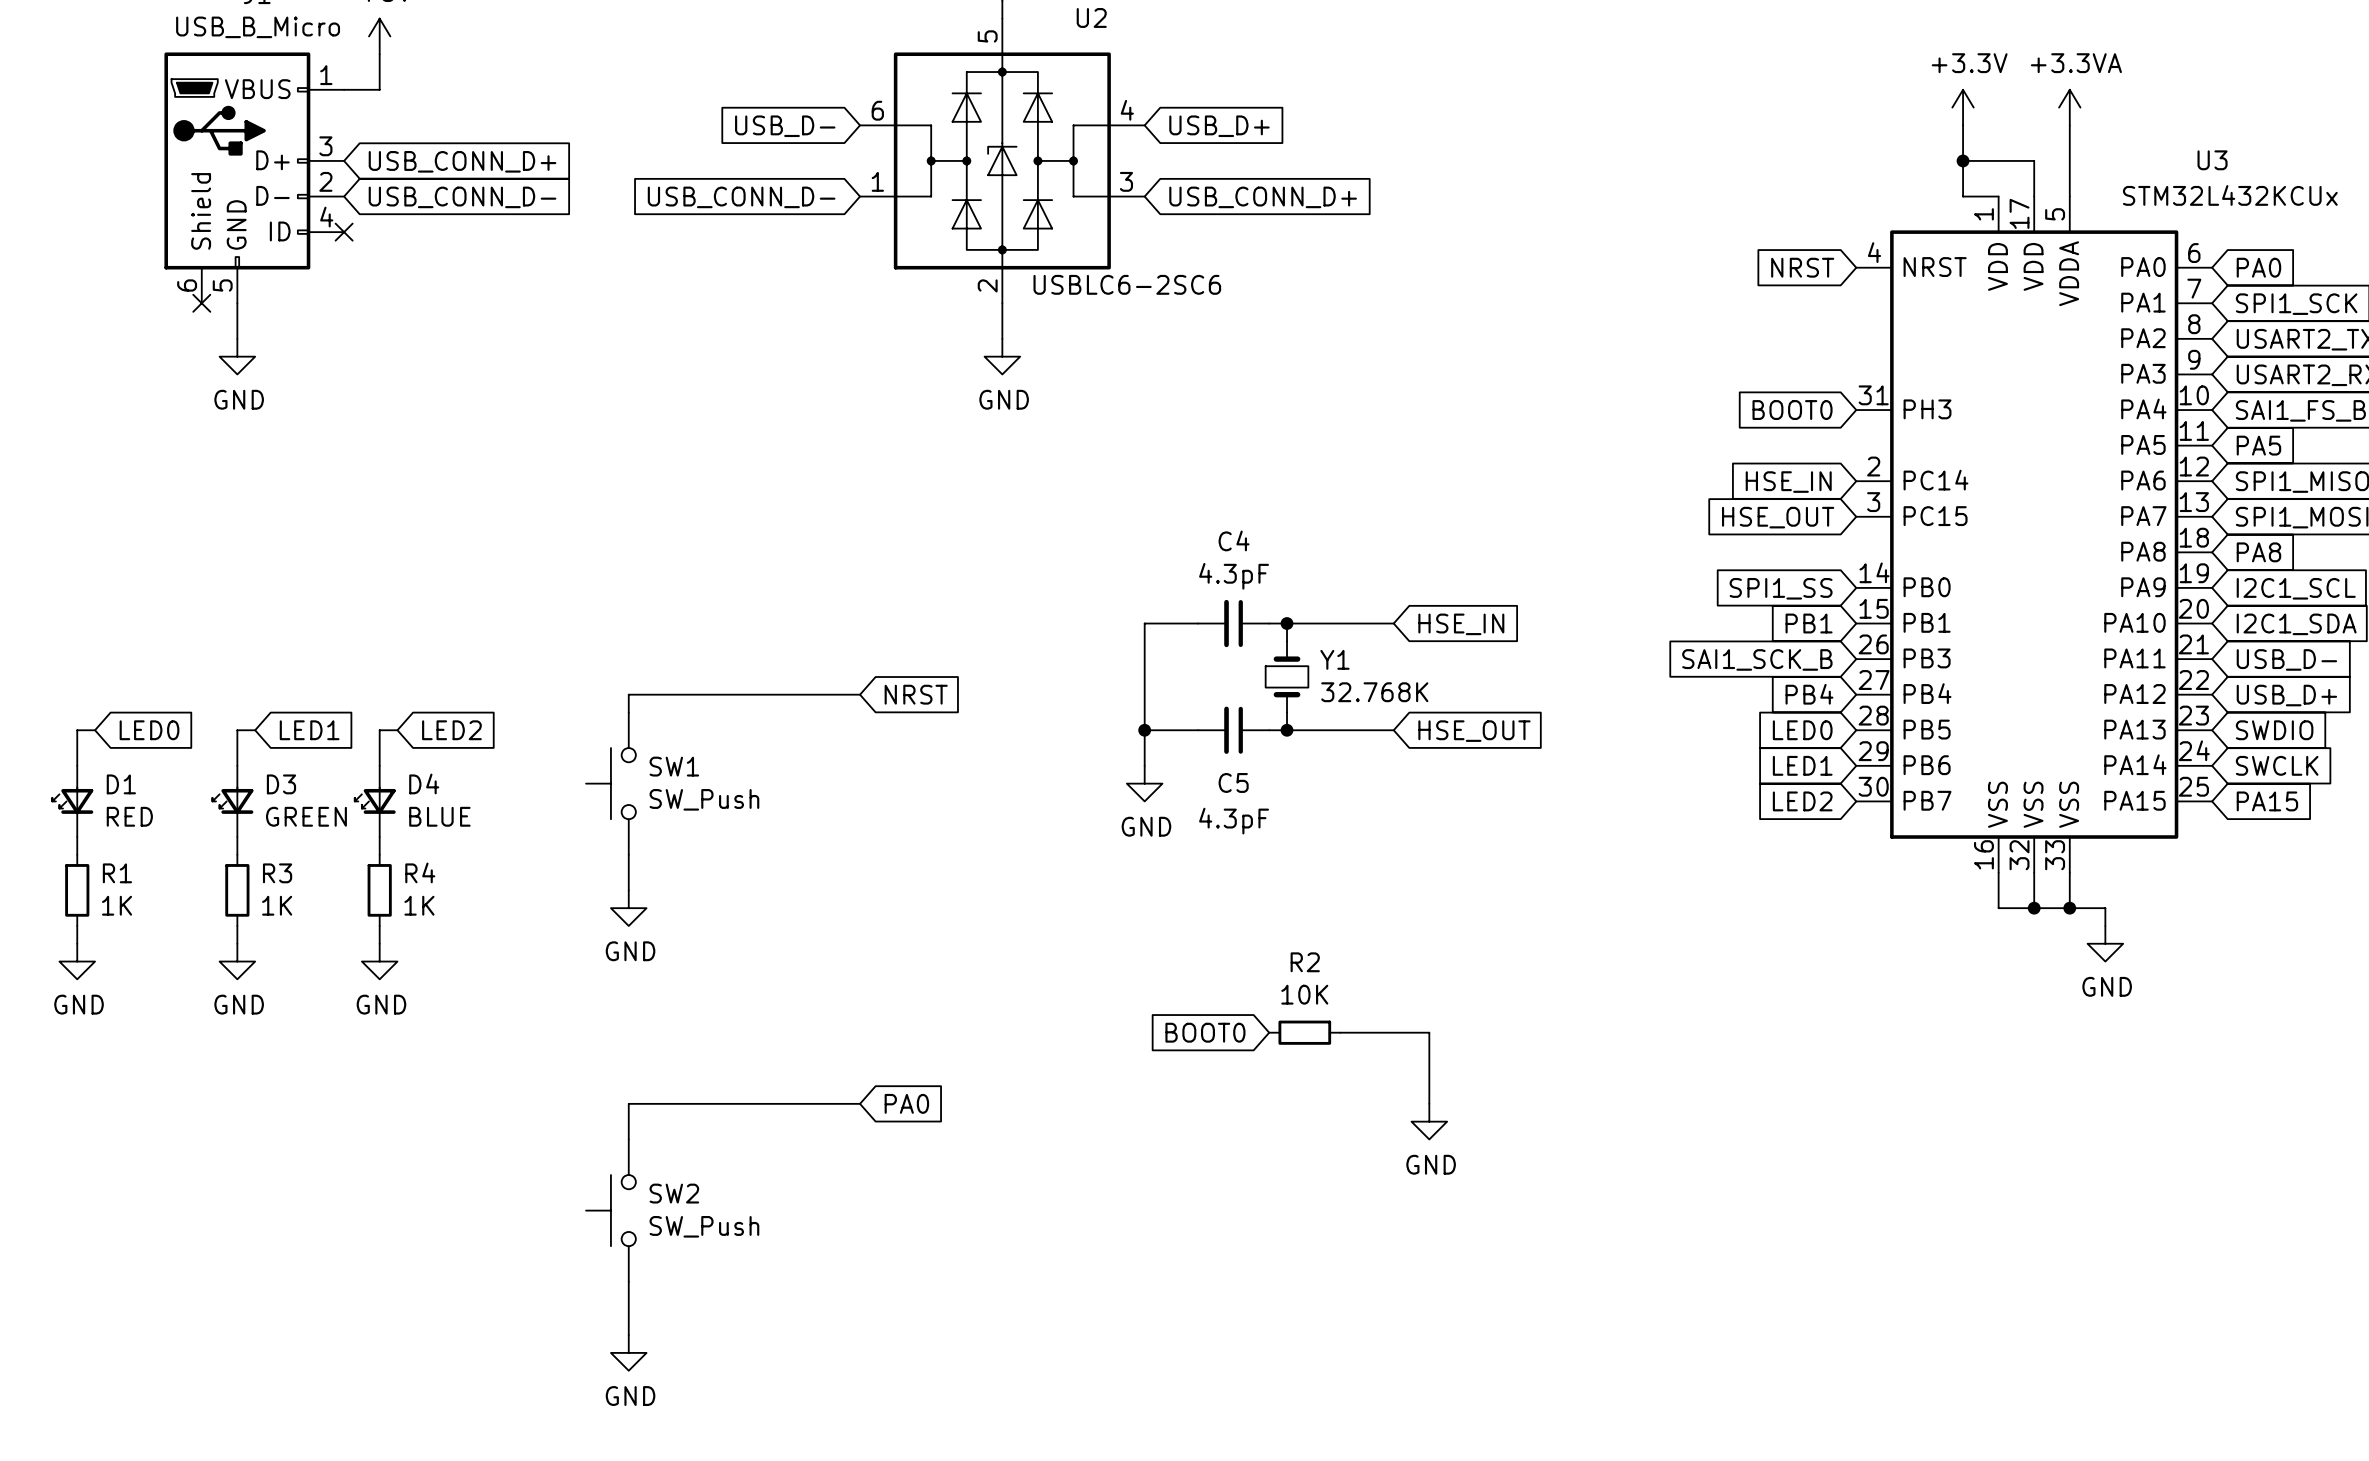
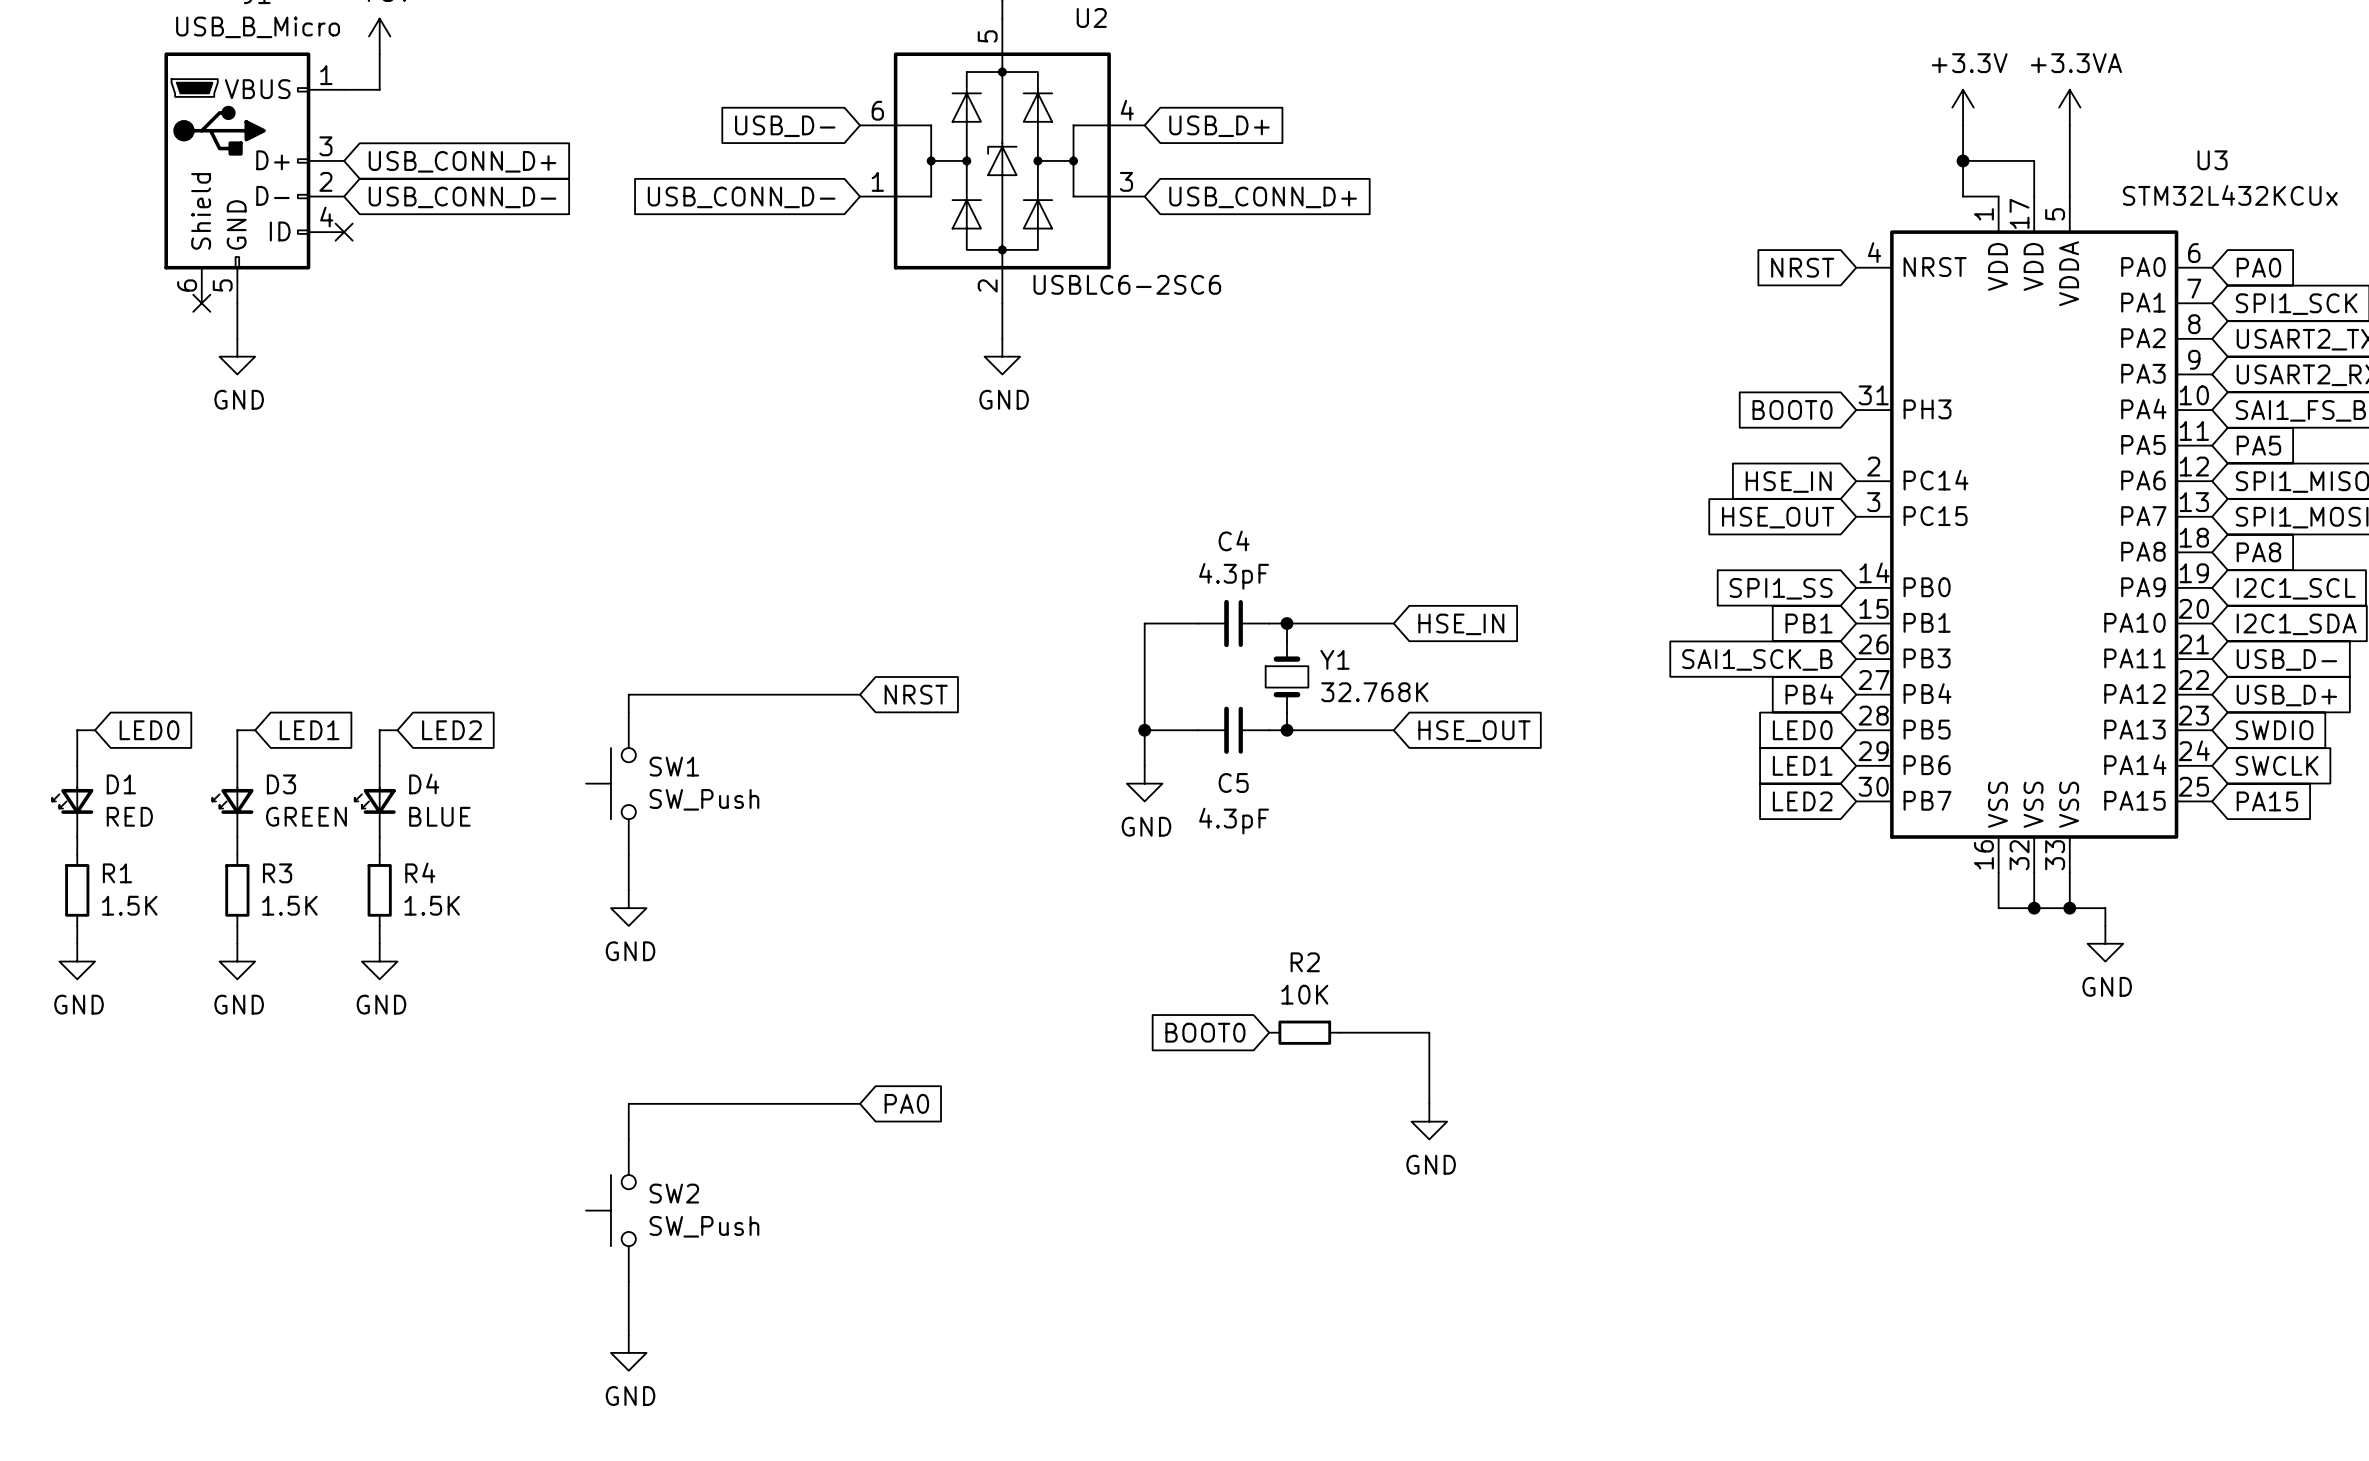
R1 value: 1K (117, 905) -> 1.5K (129, 905)
R3 value: 1K (277, 905) -> 1.5K (289, 905)
R4 value: 1K (419, 905) -> 1.5K (432, 905)

